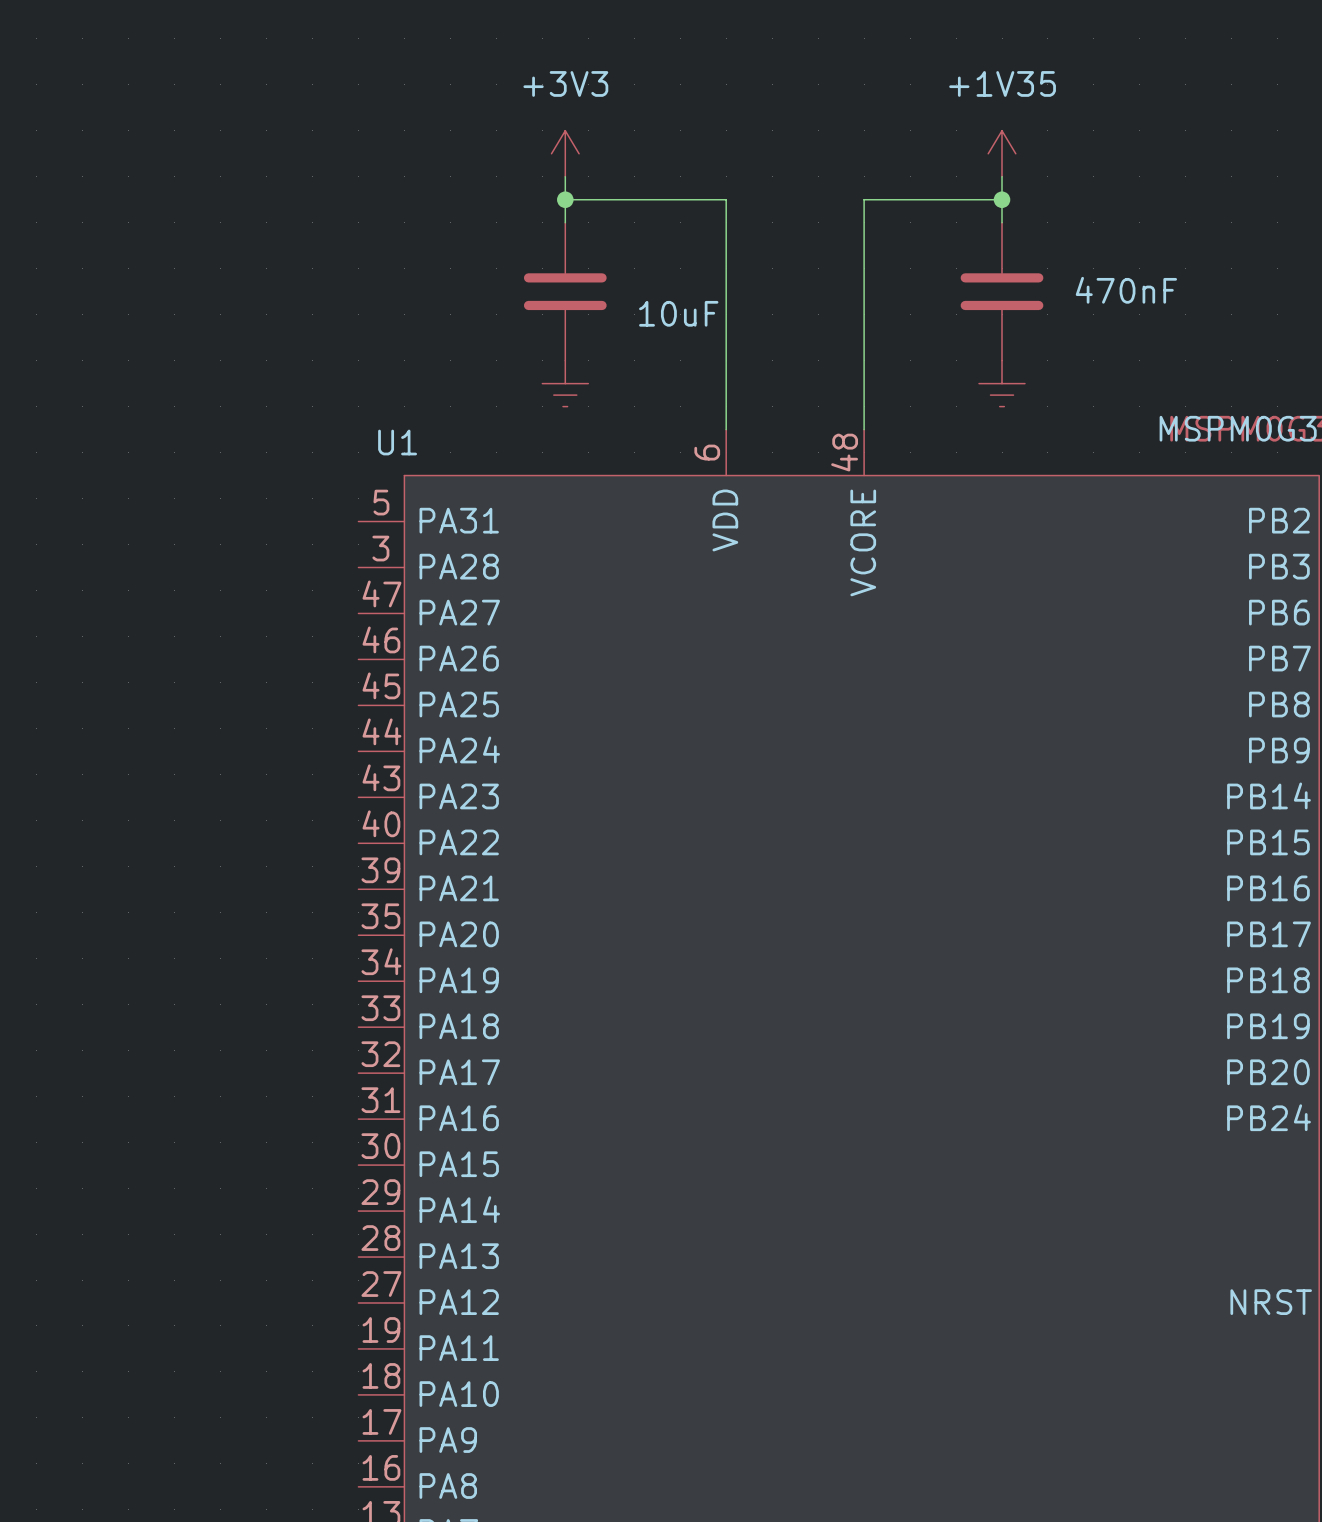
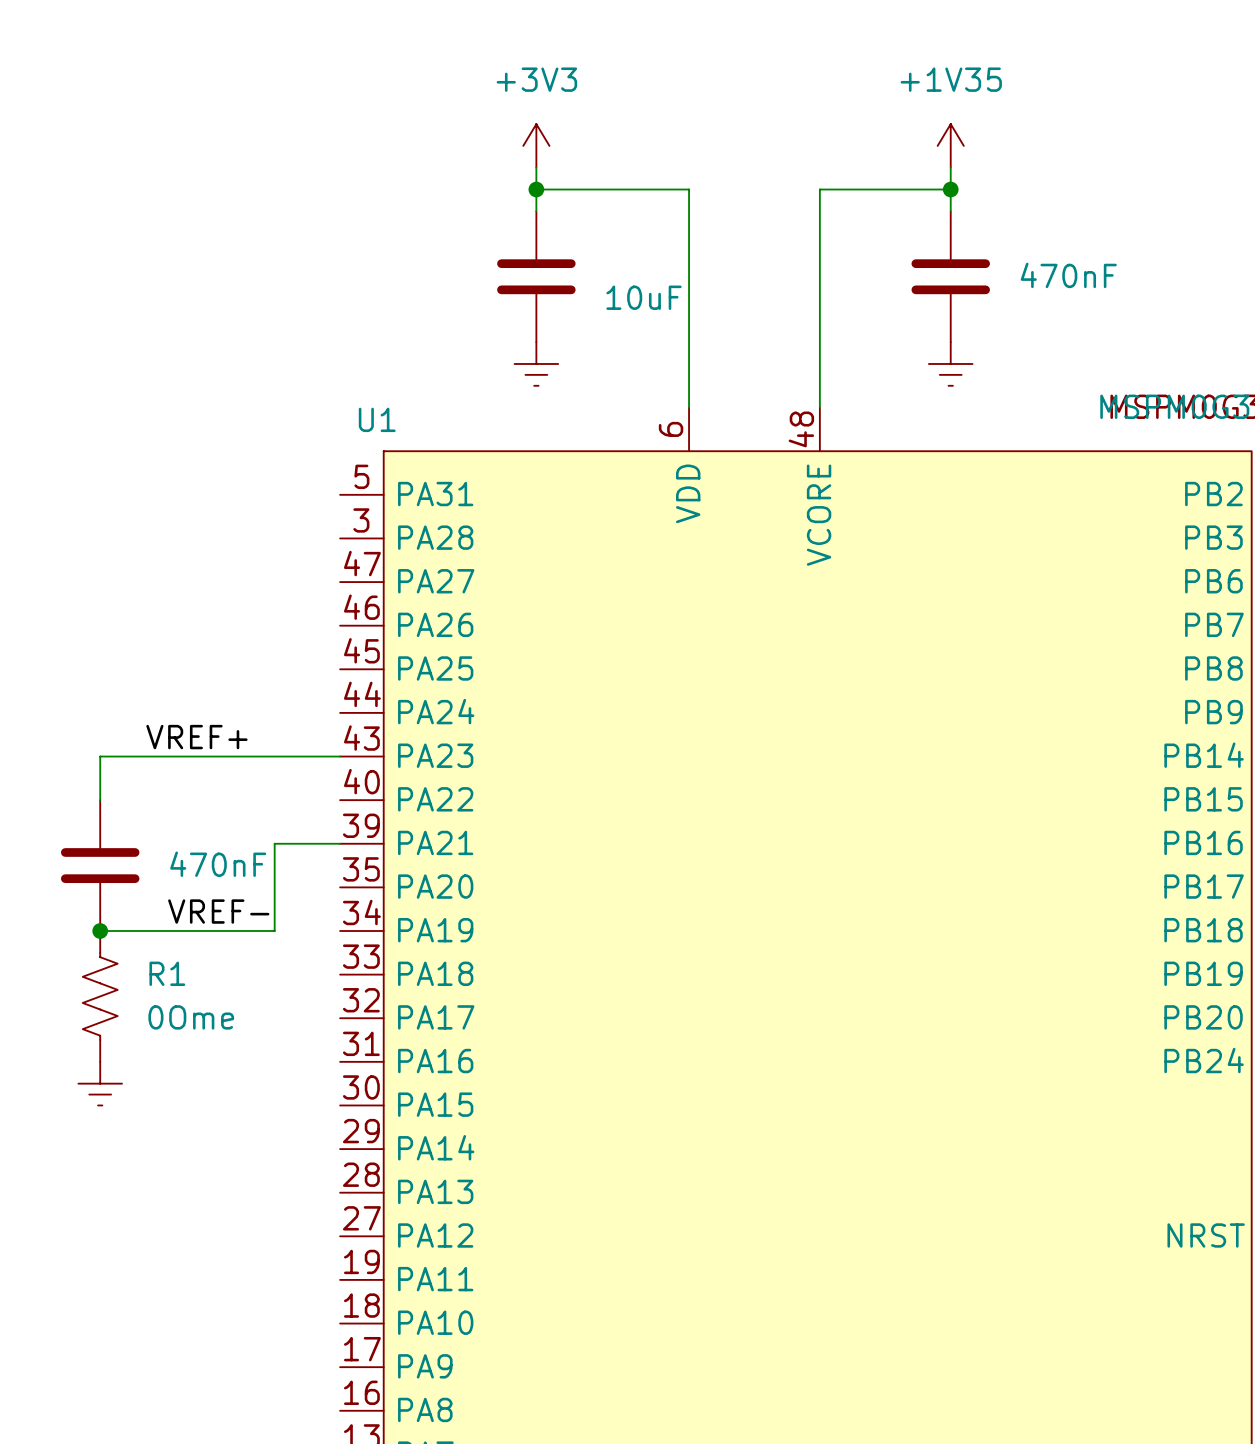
label: none -> VREF+ (196, 737)
wire: none -> (340, 756) (100, 756) (100, 800)
wire: none -> (340, 843) (274, 843) (274, 931) (100, 931)
part: none -> 470nF (100, 865)
label: none -> VREF- (218, 911)
junction: none -> (100, 931)
R1: none -> 0Ome (100, 996)
power symbol: none -> (100, 1083)

